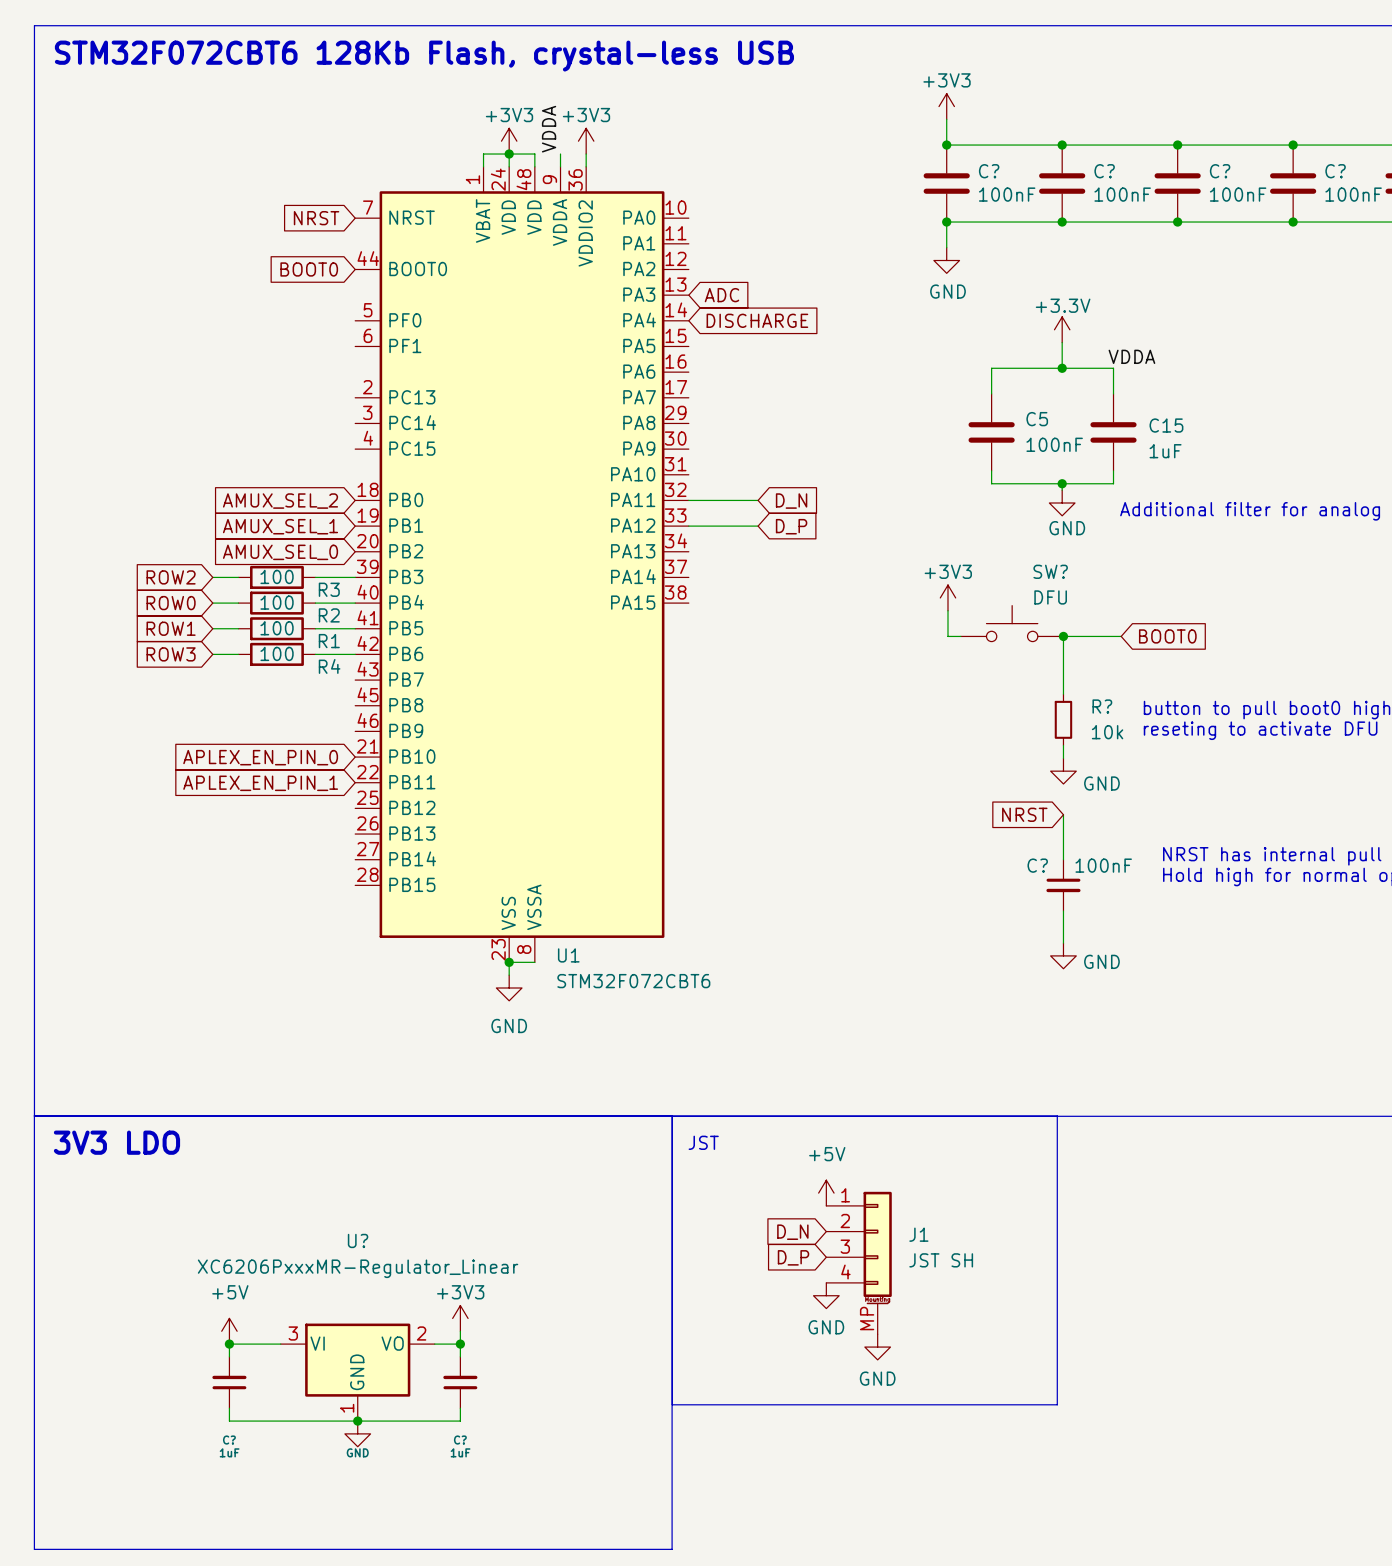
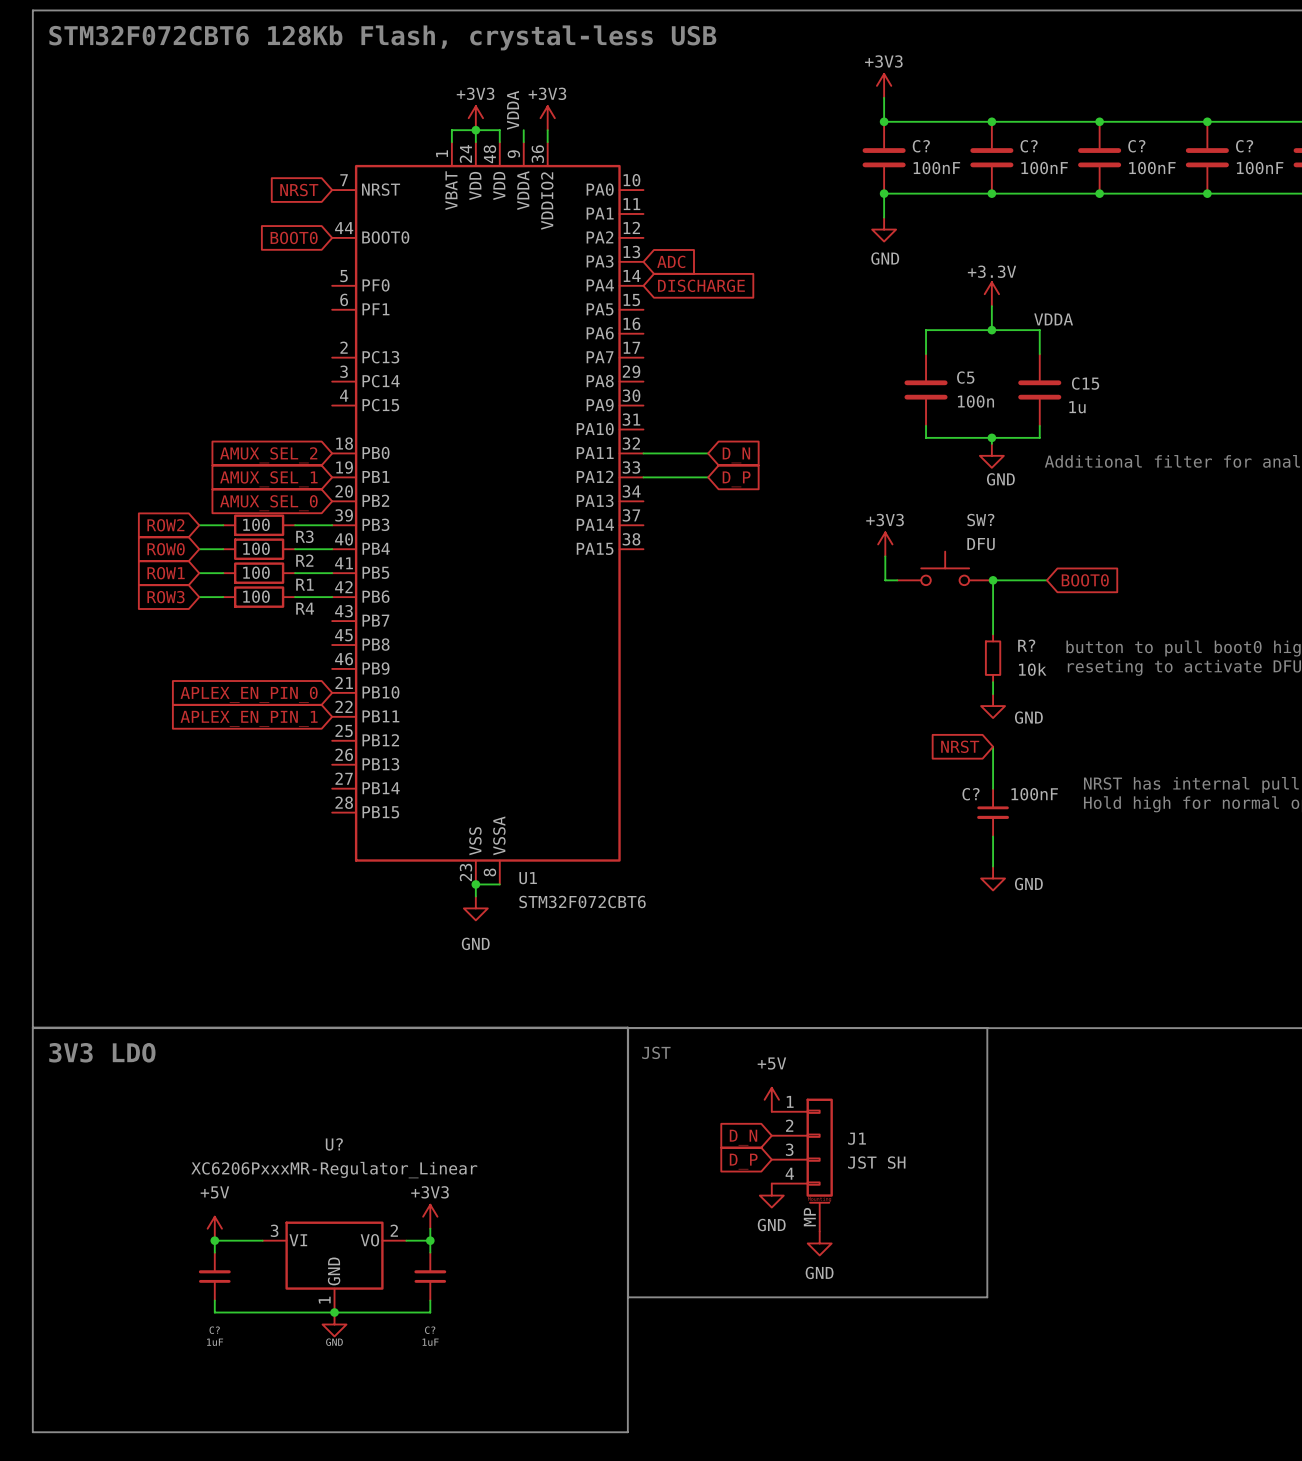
C5 value: 100nF (1054, 444) -> 100n (975, 401)
C15 value: 1uF (1165, 451) -> 1u (1077, 407)

